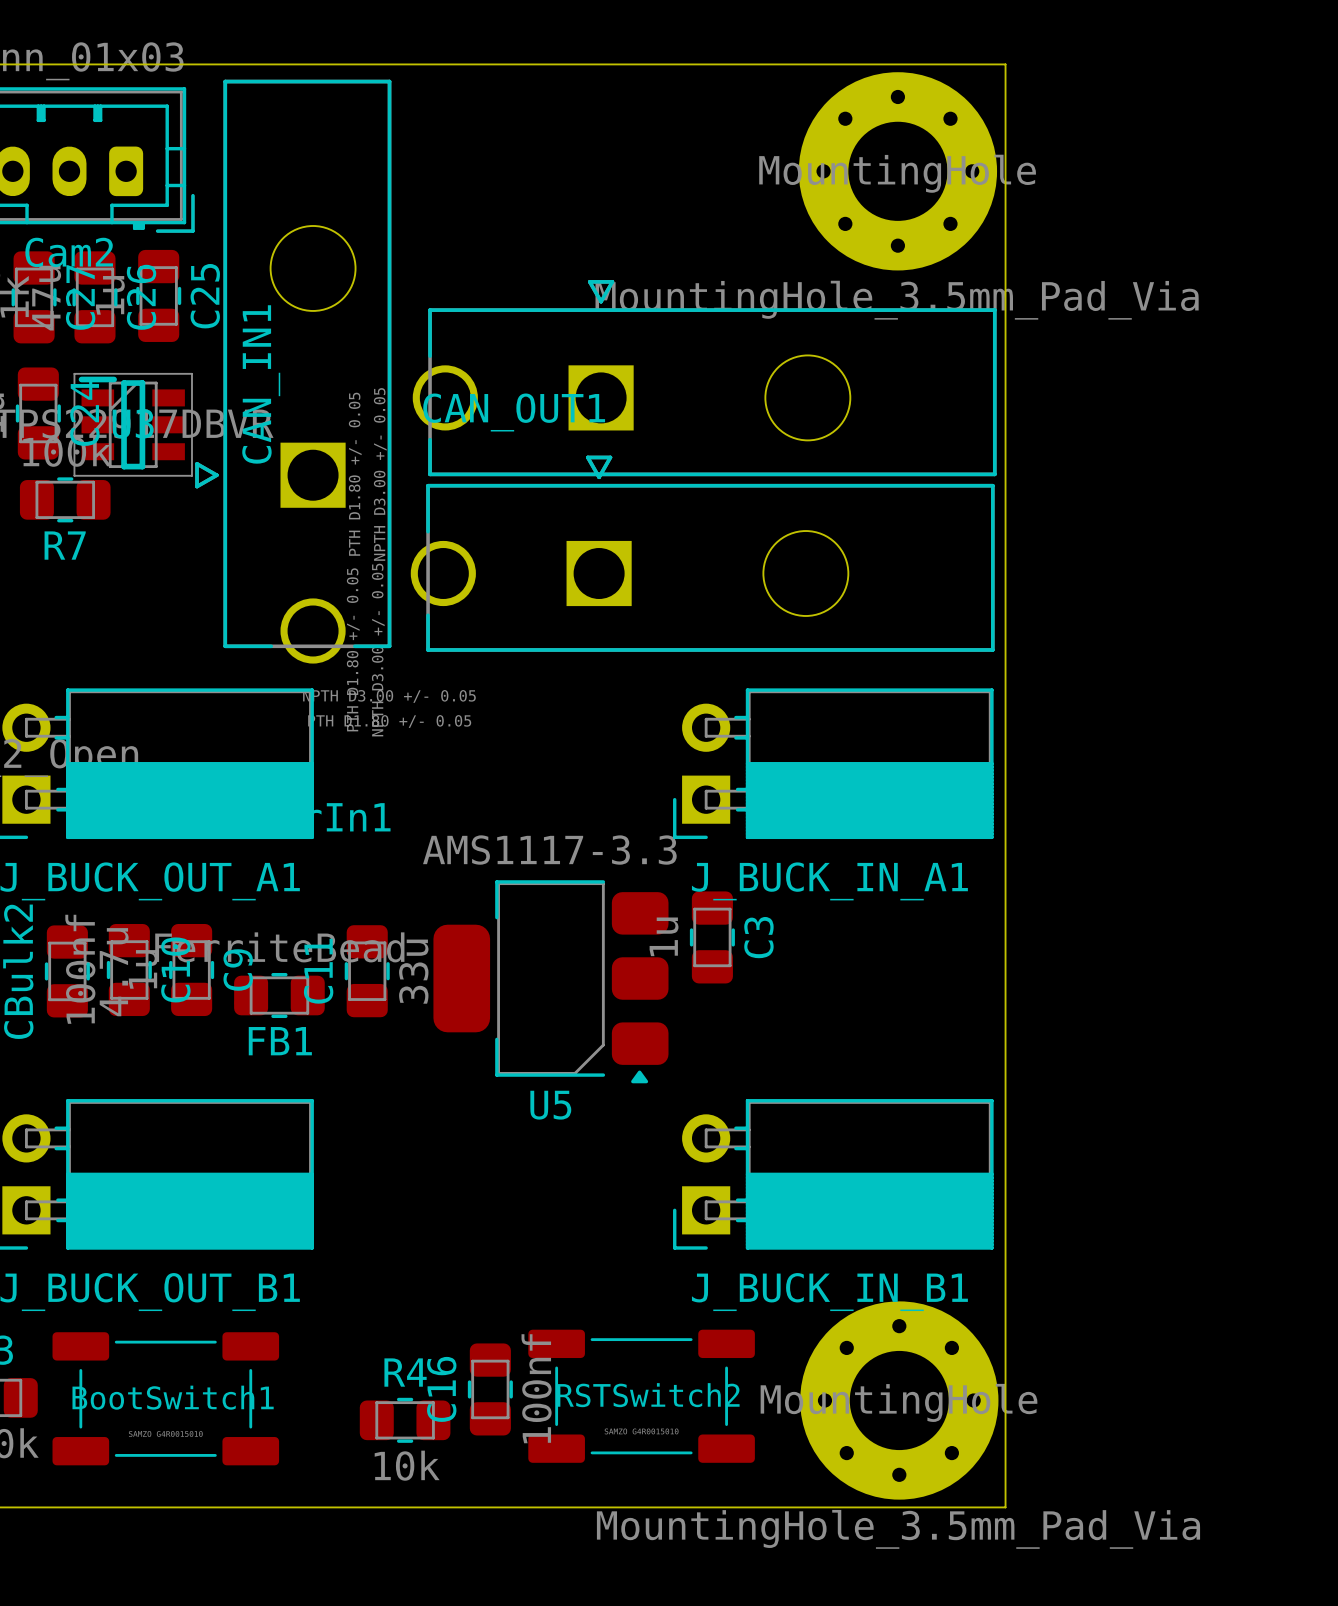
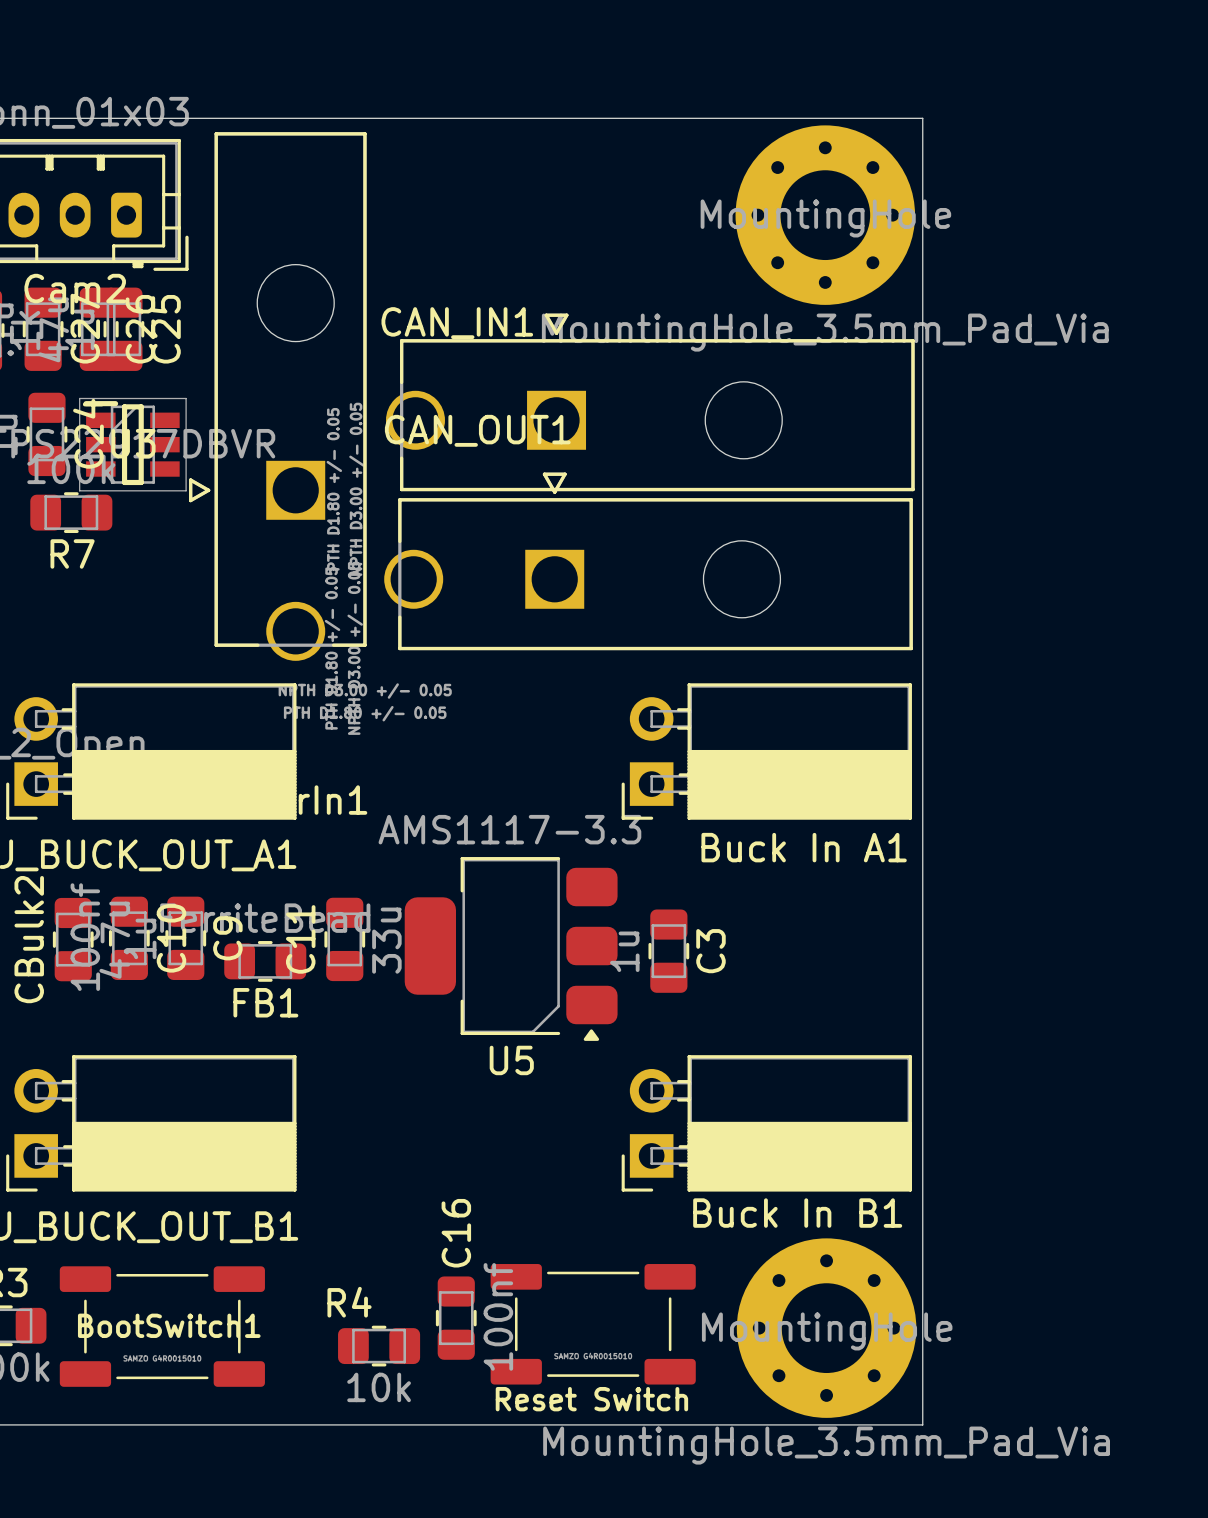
C25 position: (158, 295) -> (123, 329)
CAN_IN1 name rotation: 0° (261, 384) -> 90° clockwise (457, 323)
CAN_IN1 name position: CAN_IN1 (261, 384) -> CAN_IN1 (457, 323)
J_BUCK_IN_A1 name: J_BUCK_IN_A1 (829, 881) -> Buck In A1 (804, 847)
C3 position: (712, 937) -> (668, 951)
J_BUCK_IN_B1 name: J_BUCK_IN_B1 (829, 1292) -> Buck In B1 (797, 1213)
R4 name position: R4 (405, 1372) -> R4 (349, 1302)
C16 name position: C16 (441, 1389) -> C16 (456, 1233)
RSTSwitch2 name: RSTSwitch2 (648, 1395) -> Reset Switch (591, 1399)

